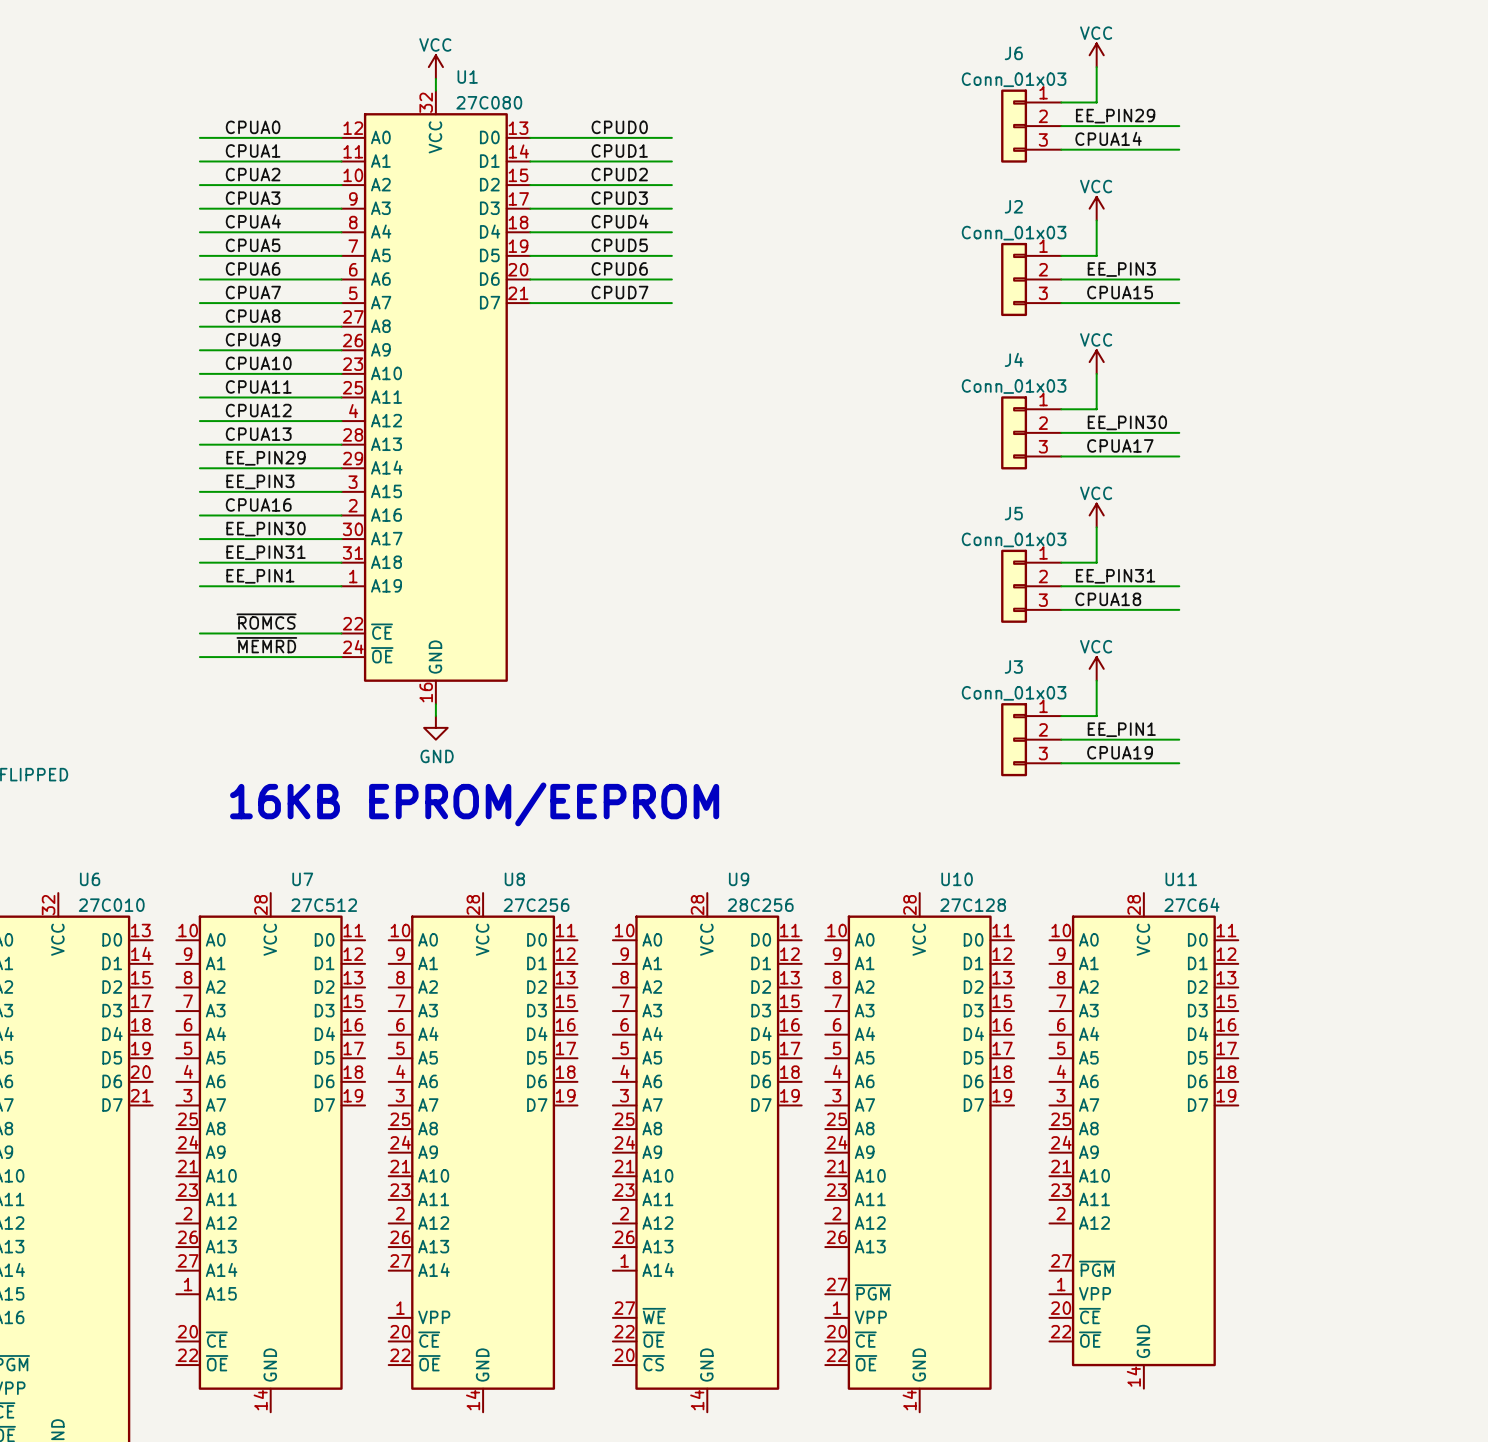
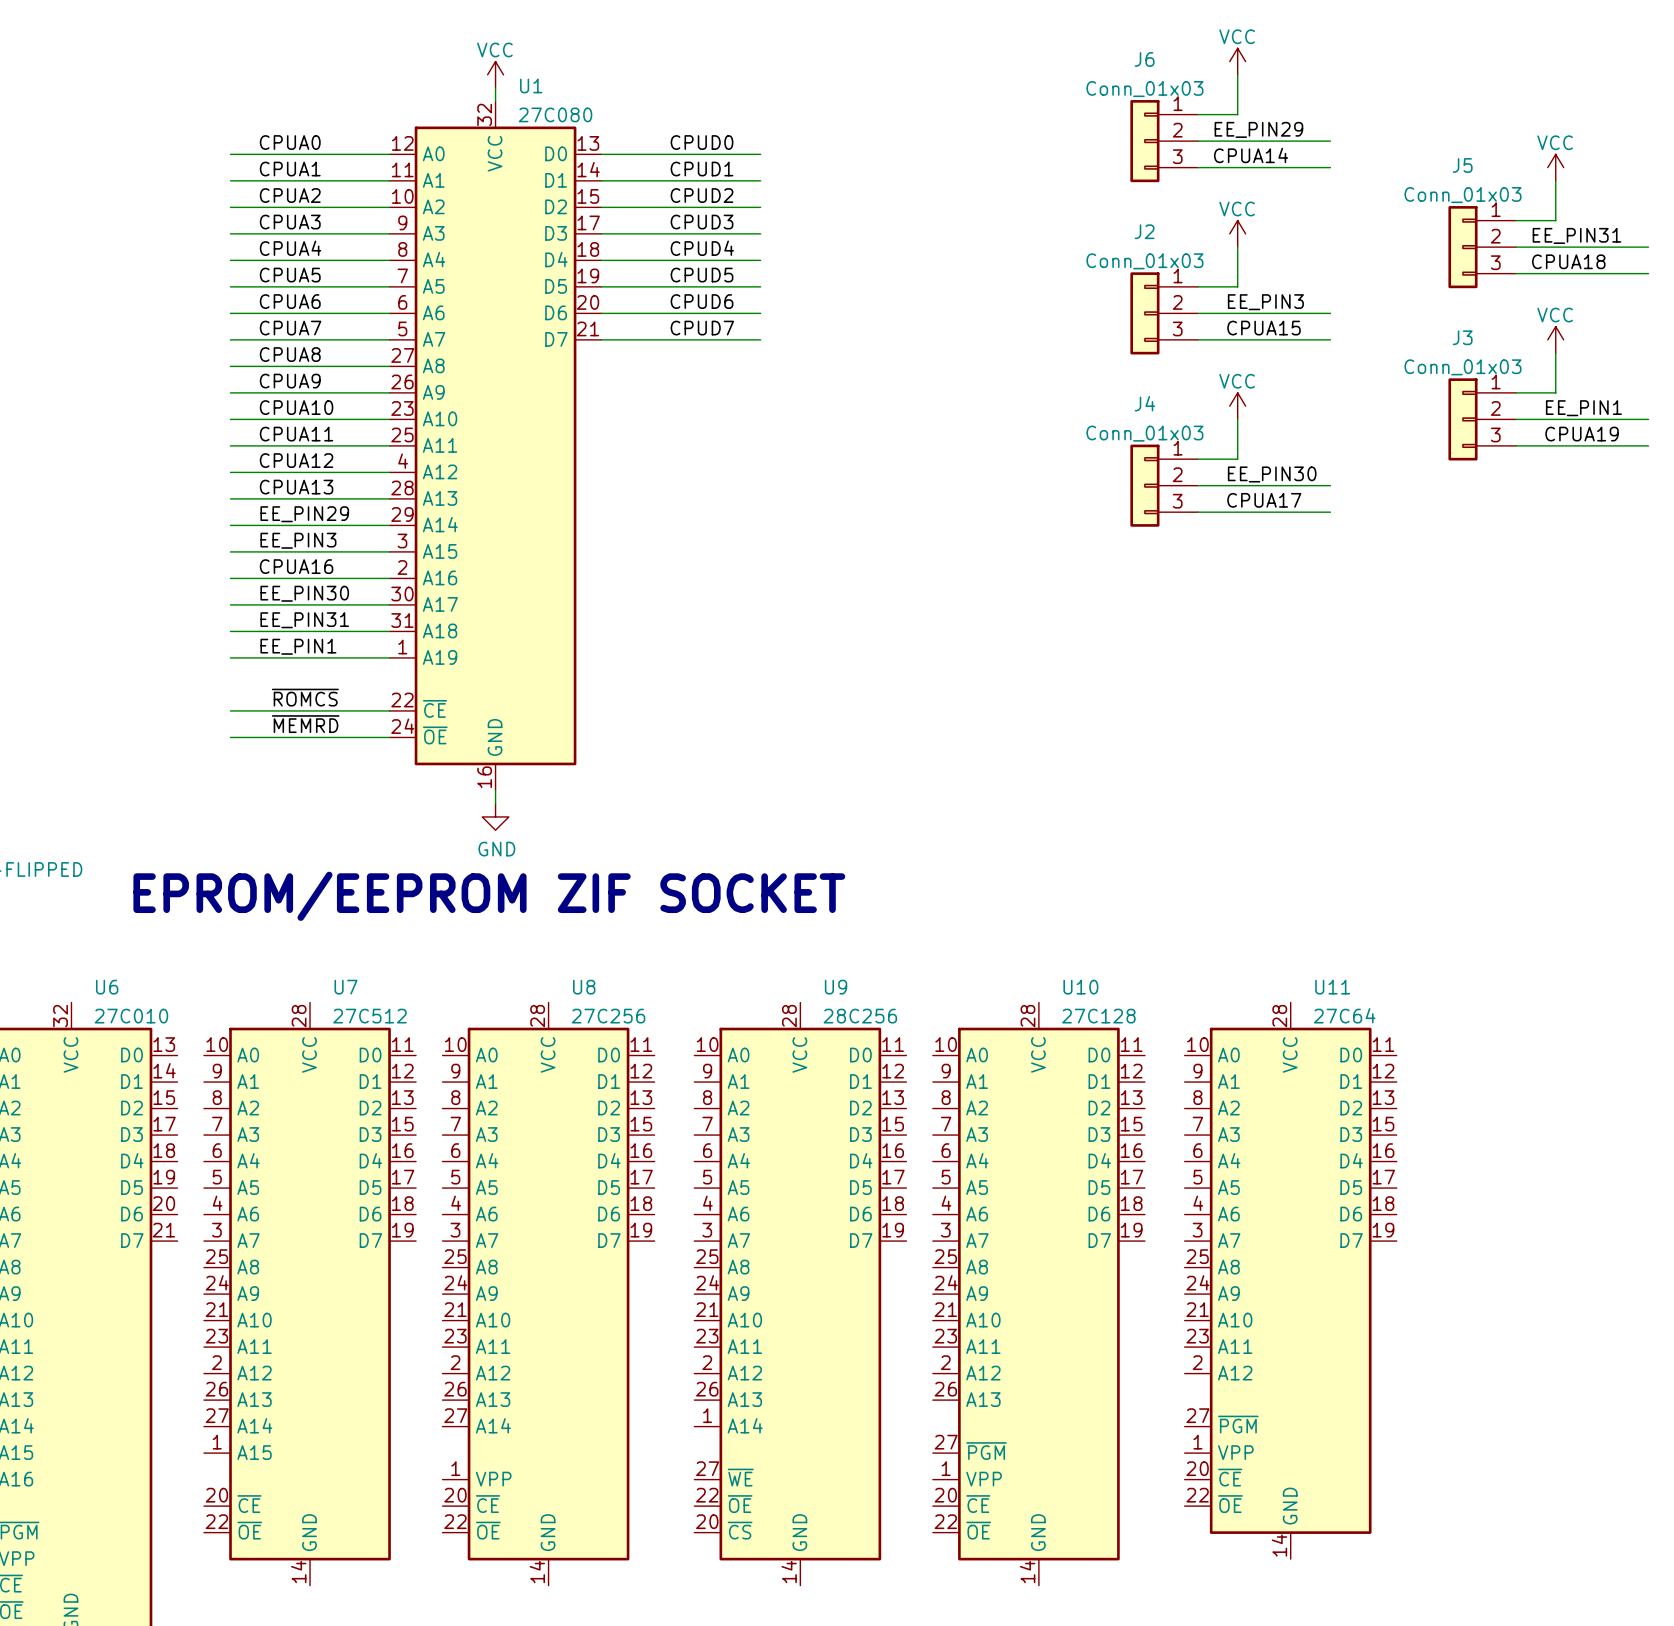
power symbol: none -> VCC (1555, 167)
wire: none -> (1555, 180) (1555, 220) (1515, 220)
label: none -> EE_PIN31 (1576, 235)
wire: none -> (1515, 247) (1648, 247)
label: none -> CPUA18 (1568, 261)
wire: none -> (1515, 273) (1648, 273)
power symbol: none -> VCC (1555, 339)
wire: none -> (1555, 353) (1555, 392) (1515, 392)
label: none -> EE_PIN1 (1583, 408)
wire: none -> (1515, 419) (1648, 419)
label: none -> CPUA19 (1582, 434)
wire: none -> (1515, 445) (1648, 445)
power symbol: VCC (1096, 515) -> none
wire: (1096, 527) (1096, 562) (1061, 562) -> none
label: EE_PIN31 (1115, 576) -> none
J5 position: (1031, 586) -> (1482, 247)
wire: (1061, 586) (1179, 586) -> none
label: CPUA18 (1108, 599) -> none
wire: (1061, 609) (1179, 609) -> none
power symbol: VCC (1096, 668) -> none
wire: (1096, 680) (1096, 716) (1061, 716) -> none
label: EE_PIN1 (1121, 729) -> none
J3 position: (1031, 739) -> (1482, 419)
wire: (1061, 739) (1179, 739) -> none
label: CPUA19 (1120, 752) -> none
wire: (1061, 763) (1179, 763) -> none
text: none -> EPROM/EEPROM ZIF SOCKET (489, 896)
text: 16KB EPROM/EEPROM (474, 804) -> none

